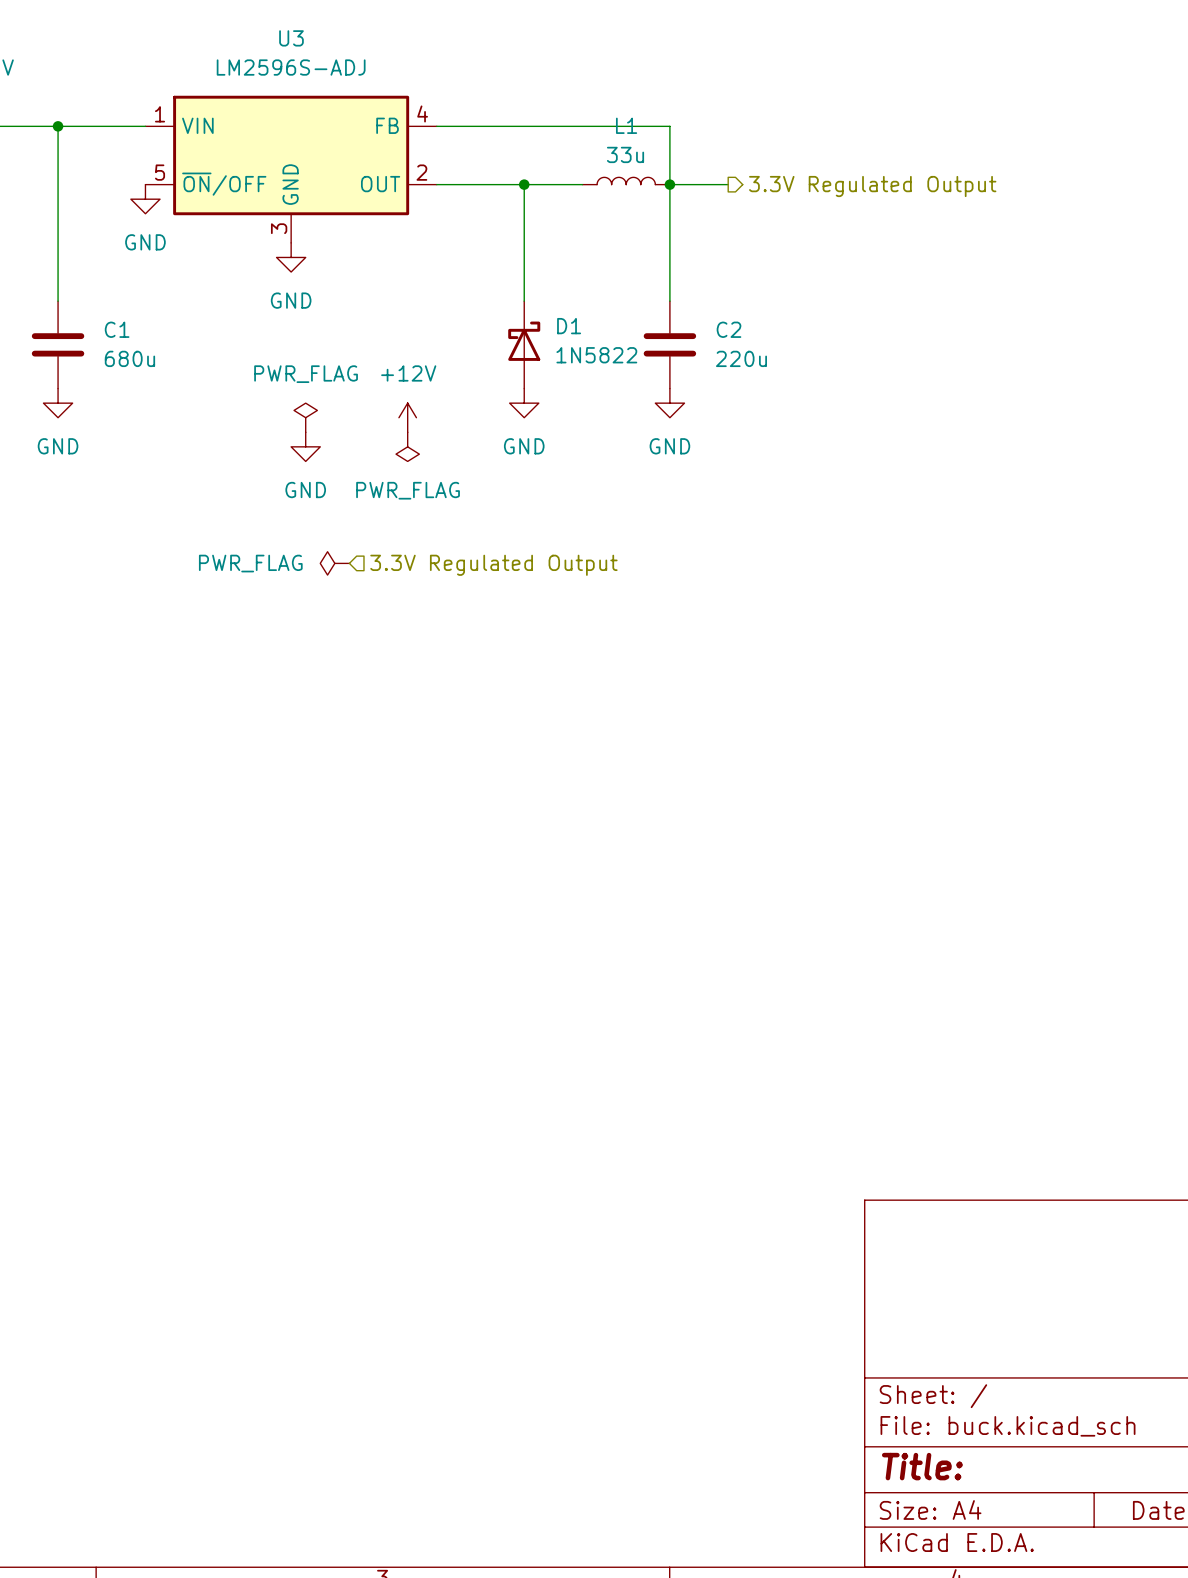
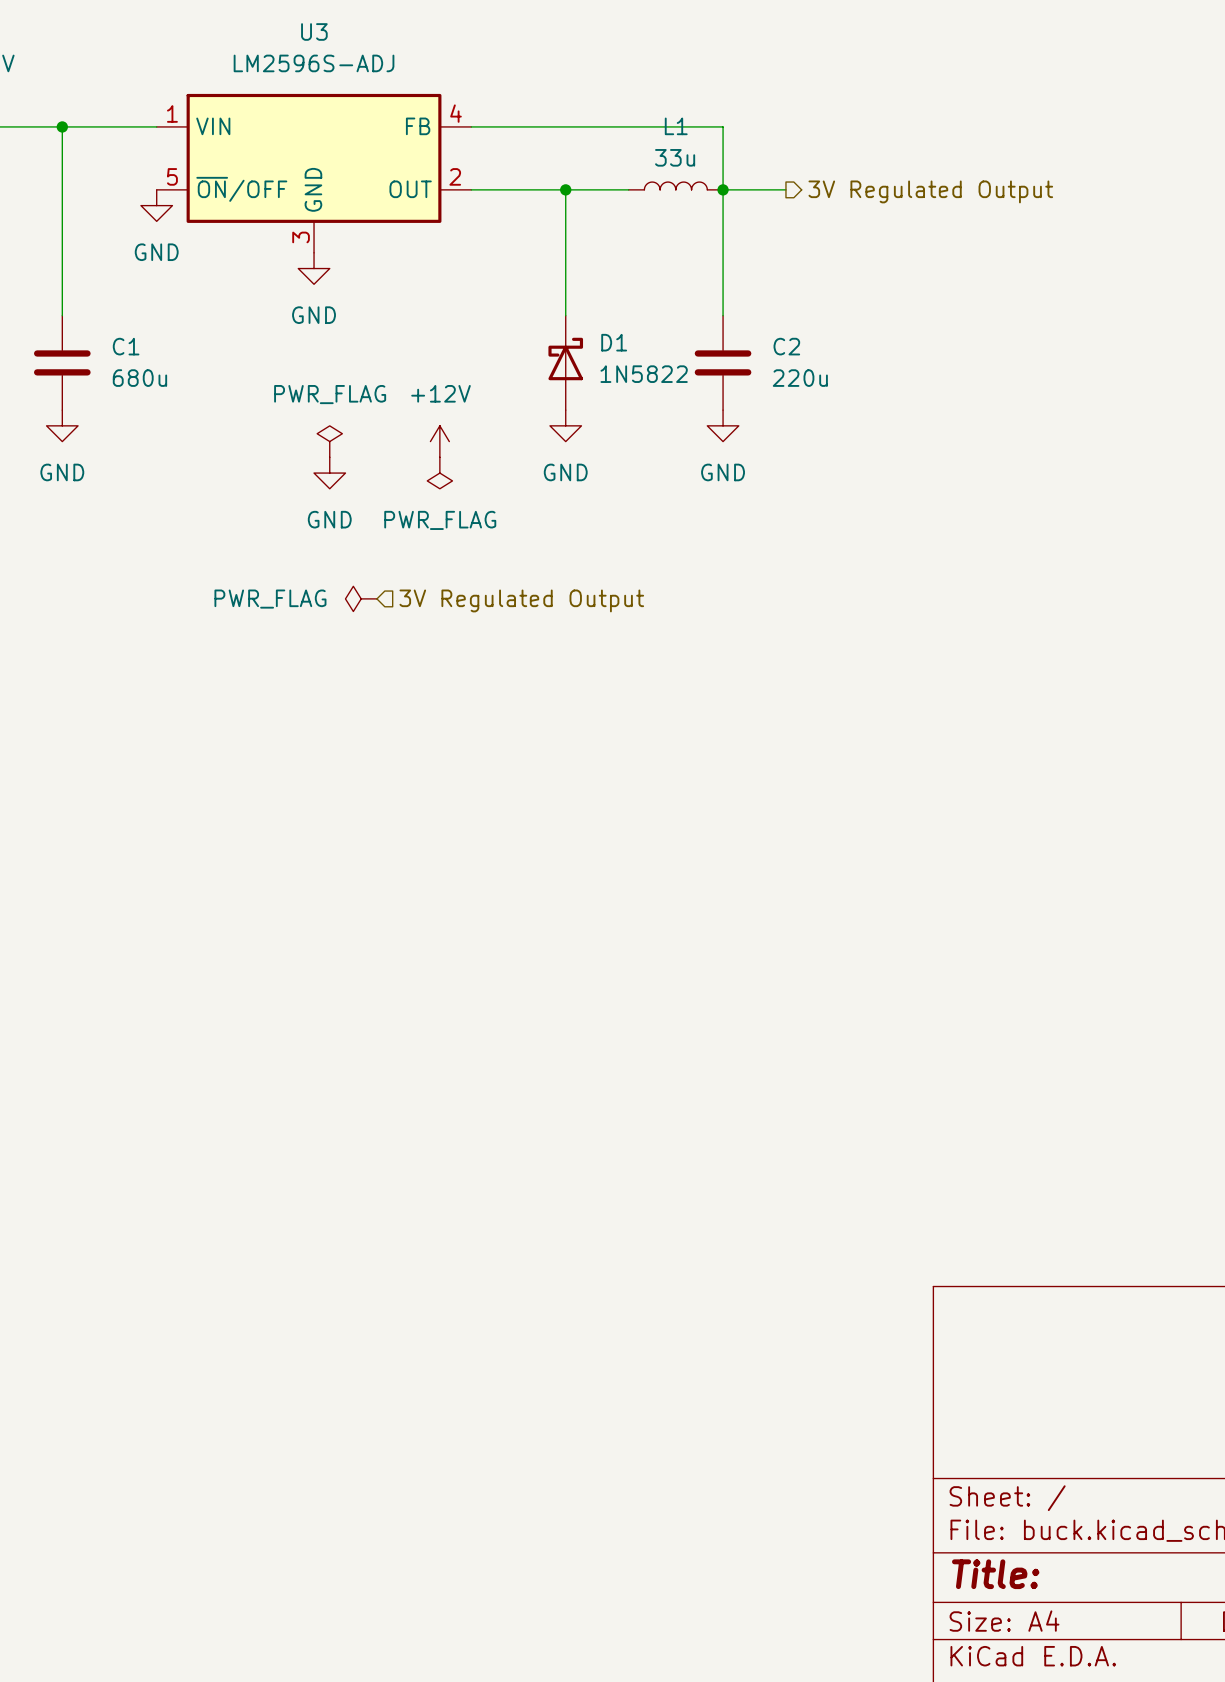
hierarchical label: 3.3V Regulated Output (872, 186) -> 3V Regulated Output (930, 191)
hierarchical label: 3.3V Regulated Output (493, 565) -> 3V Regulated Output (521, 600)

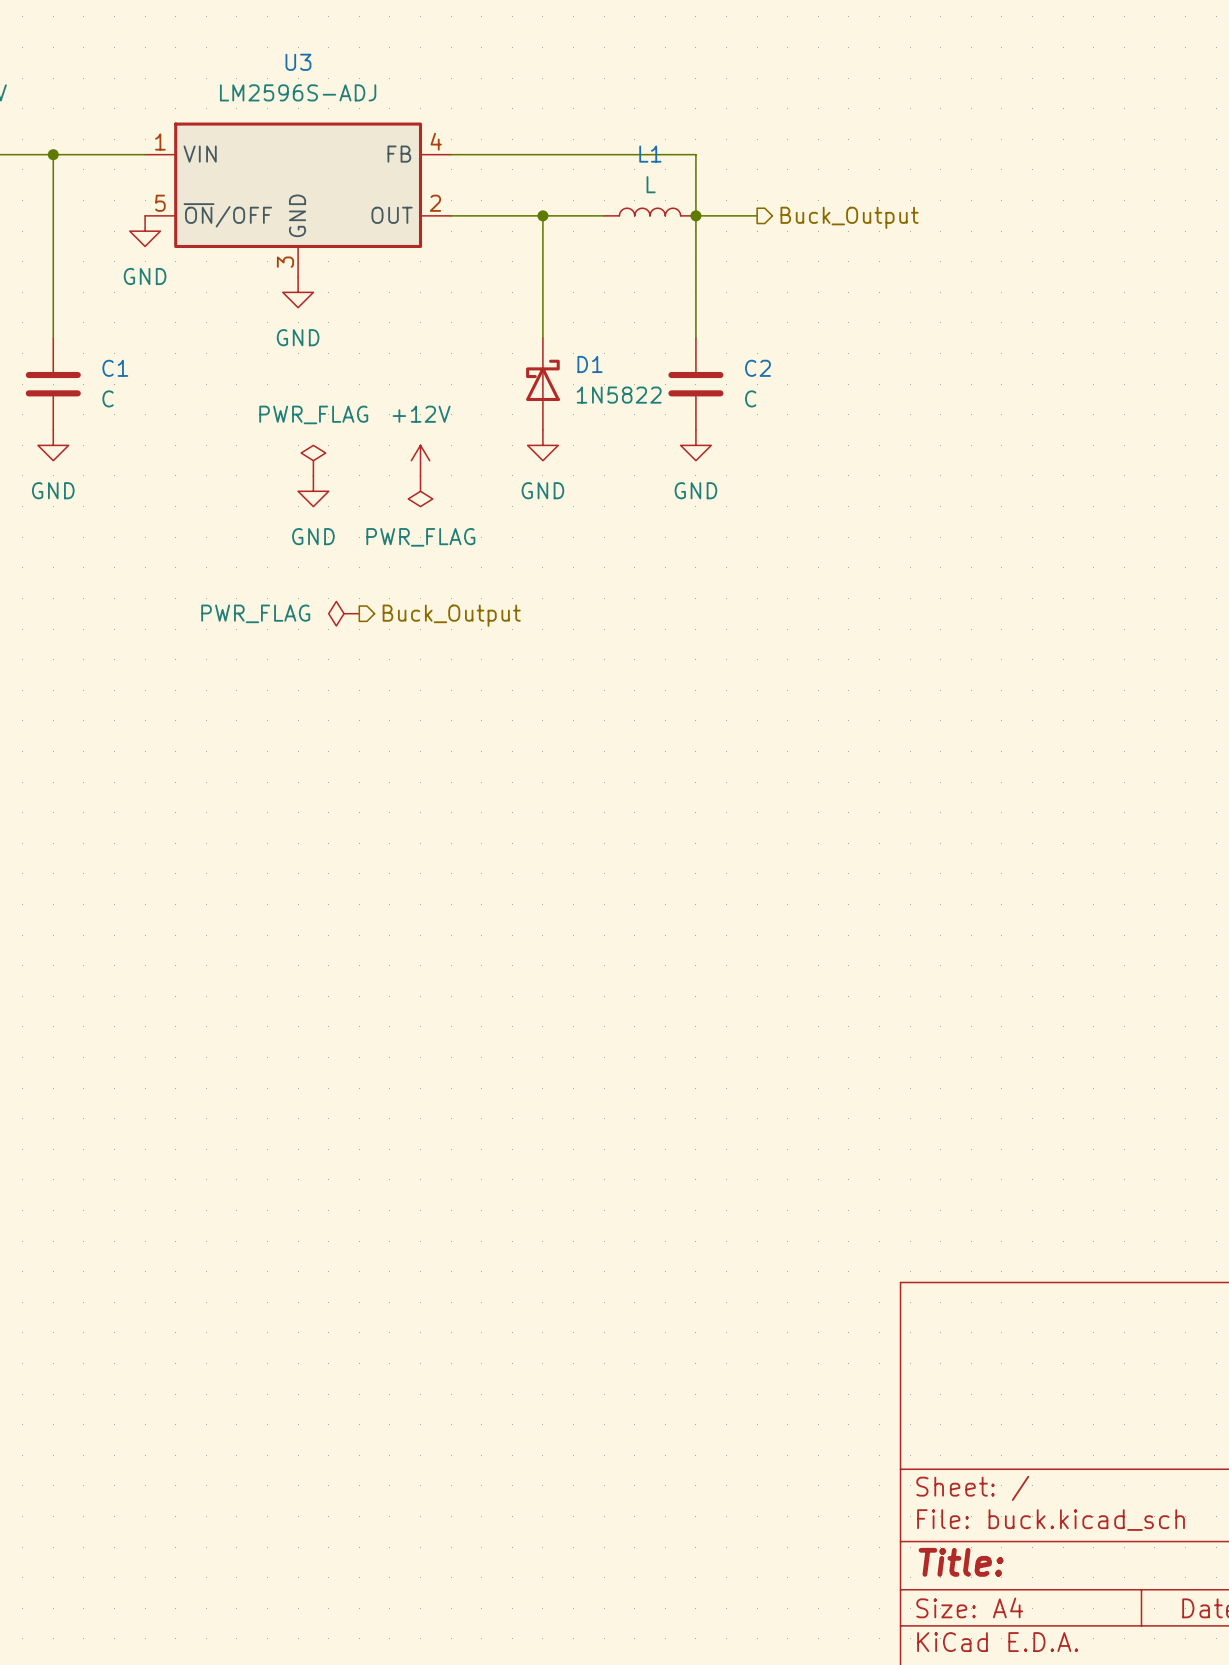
L1 value: 33u (675, 157) -> L (651, 184)
hierarchical label: 3V Regulated Output (930, 191) -> Buck_Output (849, 217)
C1 value: 680u (139, 378) -> C (108, 398)
C2 value: 220u (800, 378) -> C (750, 398)
hierarchical label shape: input (521, 600) -> output (451, 615)
hierarchical label: 3V Regulated Output (521, 600) -> Buck_Output (451, 615)

